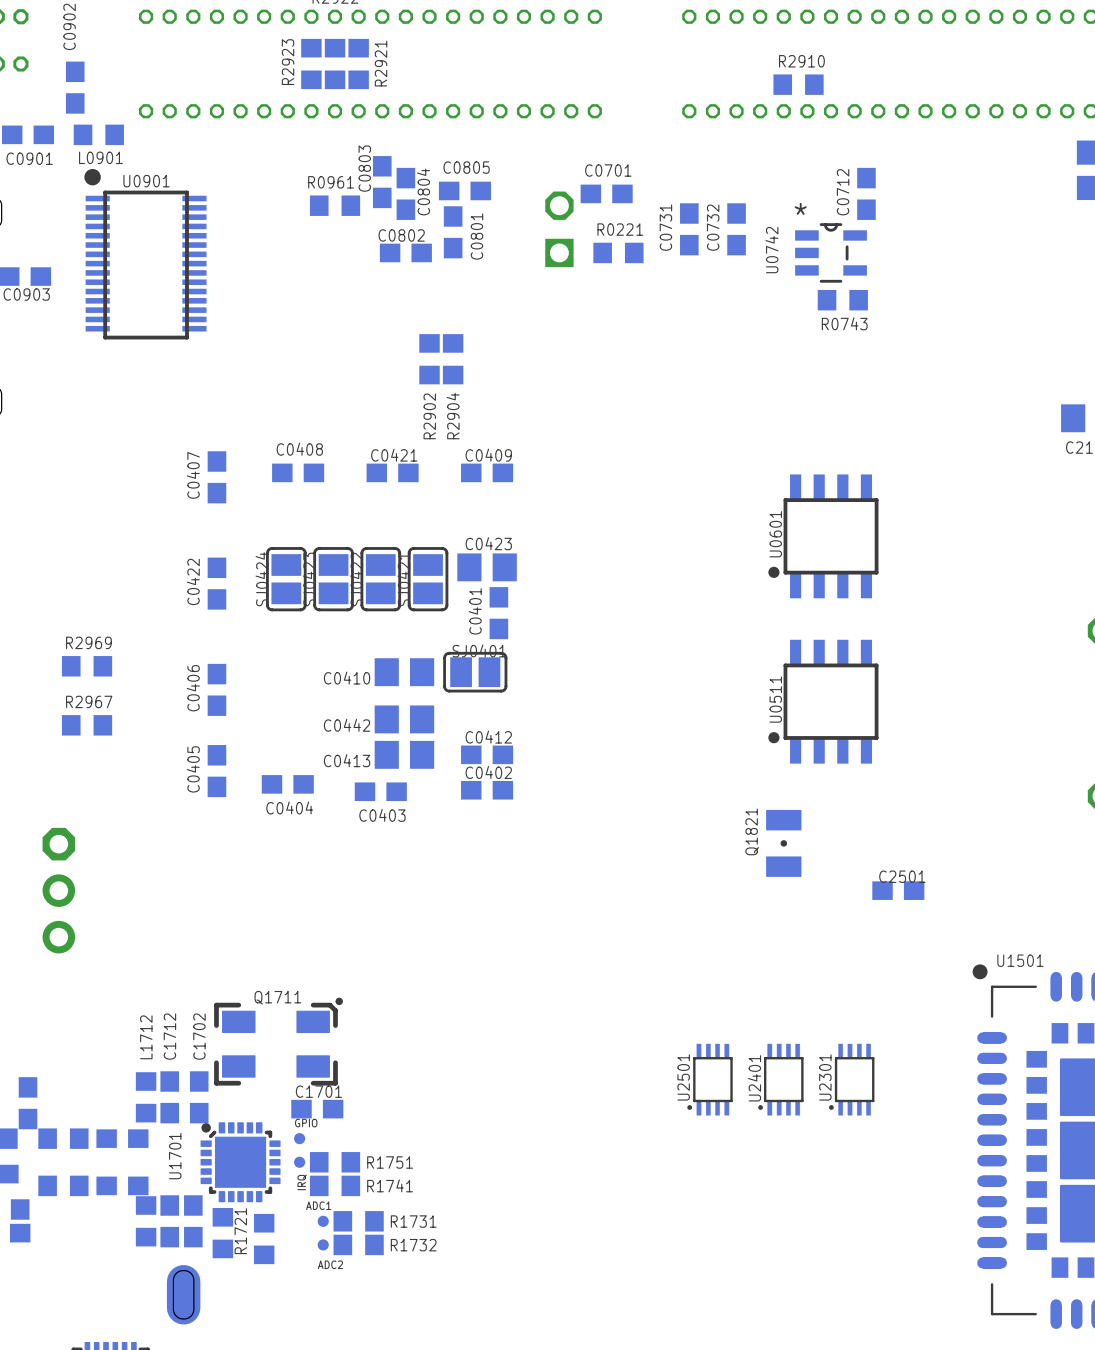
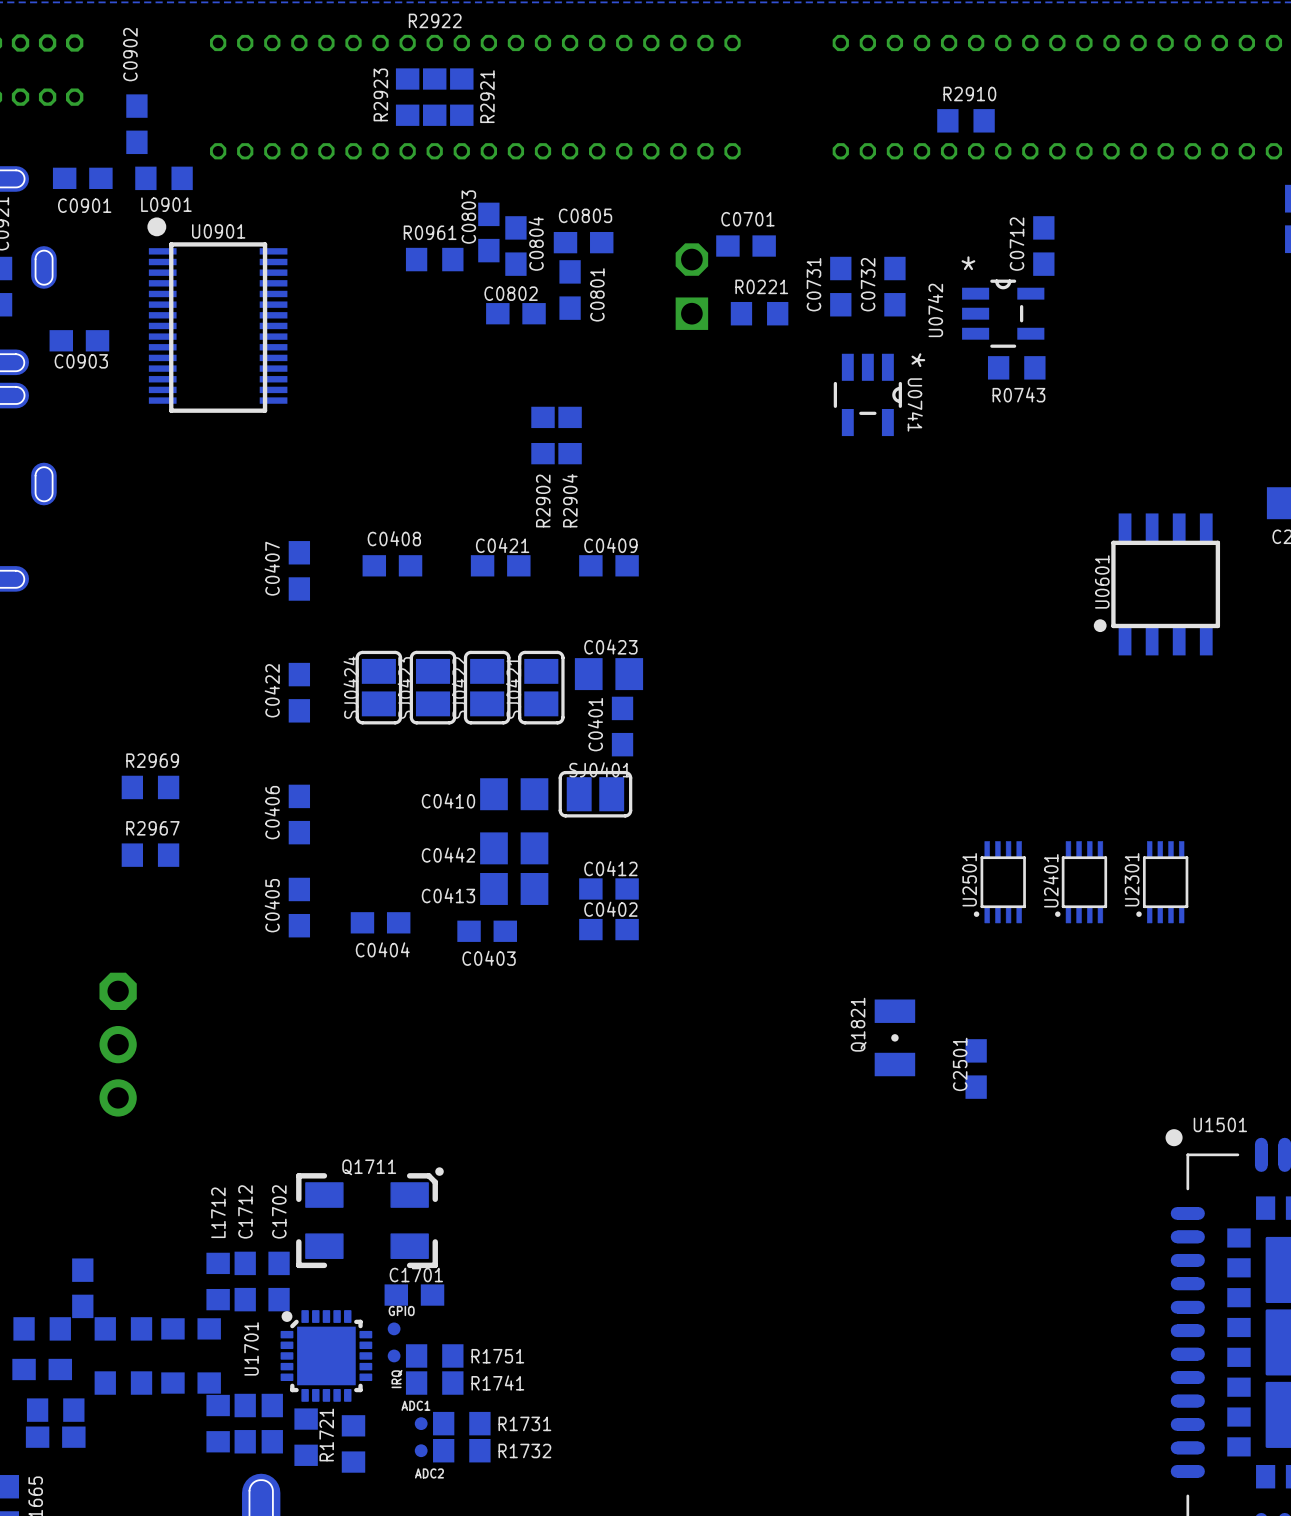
U0741: none -> (867, 394)
U0601 position: (823, 536) -> (1156, 584)
U0511: (823, 701) -> none
Q1821 position: (783, 843) -> (894, 1037)
C2501 rotation: 0° (898, 890) -> 90° clockwise (976, 1069)
C2501 position: (898, 890) -> (976, 1069)
U2501 position: (710, 1079) -> (999, 882)
U2401 position: (780, 1079) -> (1081, 882)
U2301 position: (851, 1079) -> (1162, 882)

